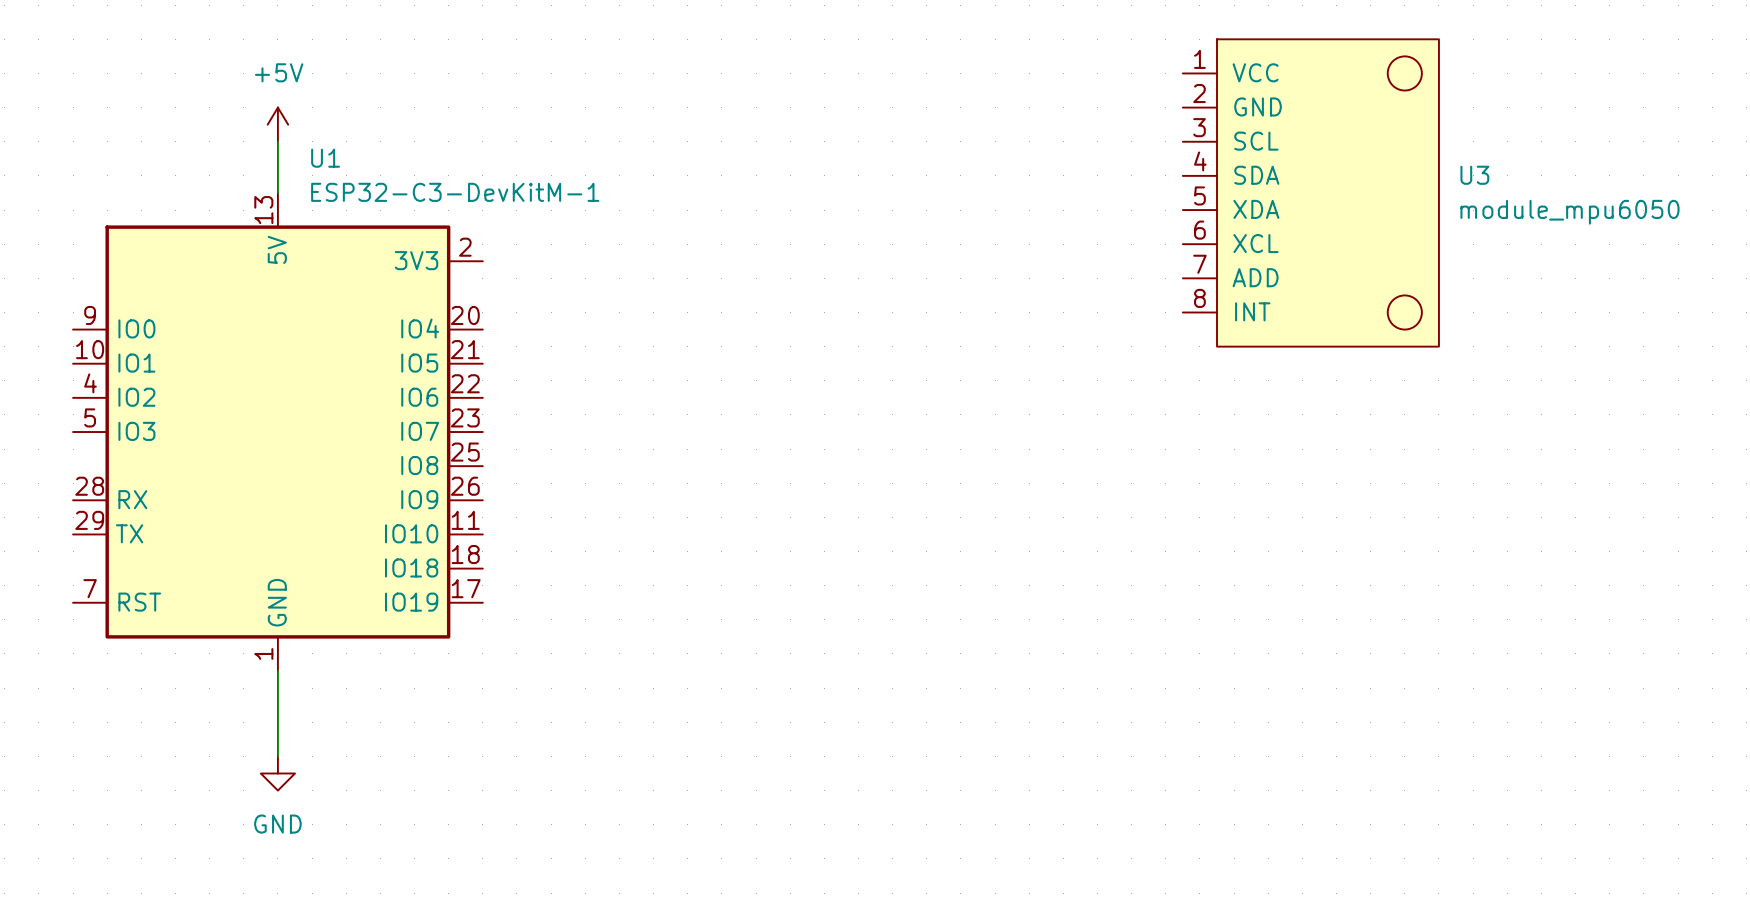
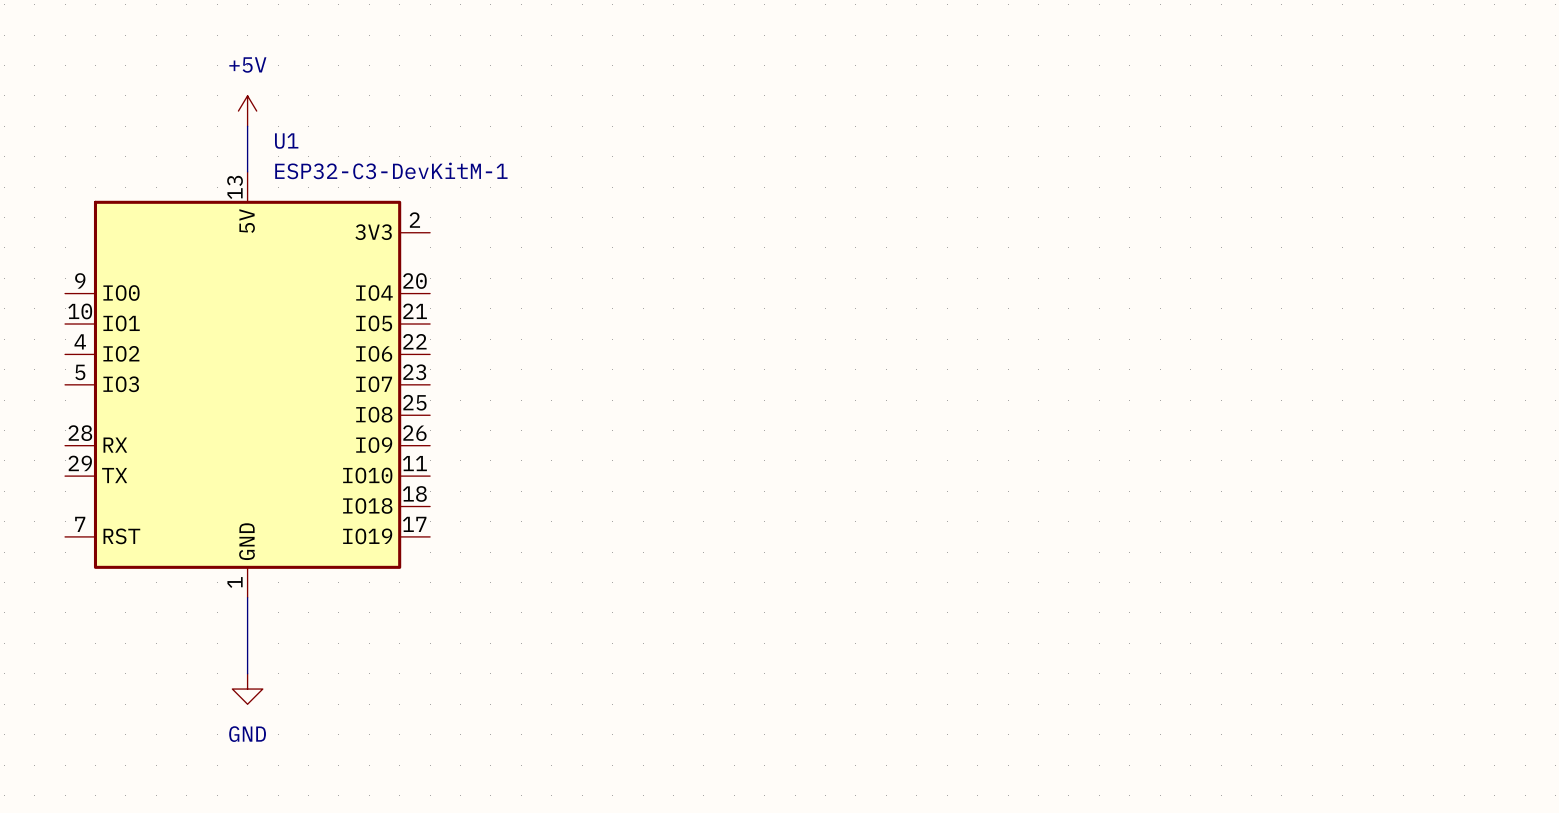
U3: module_mpu6050 (1310, 192) -> none

